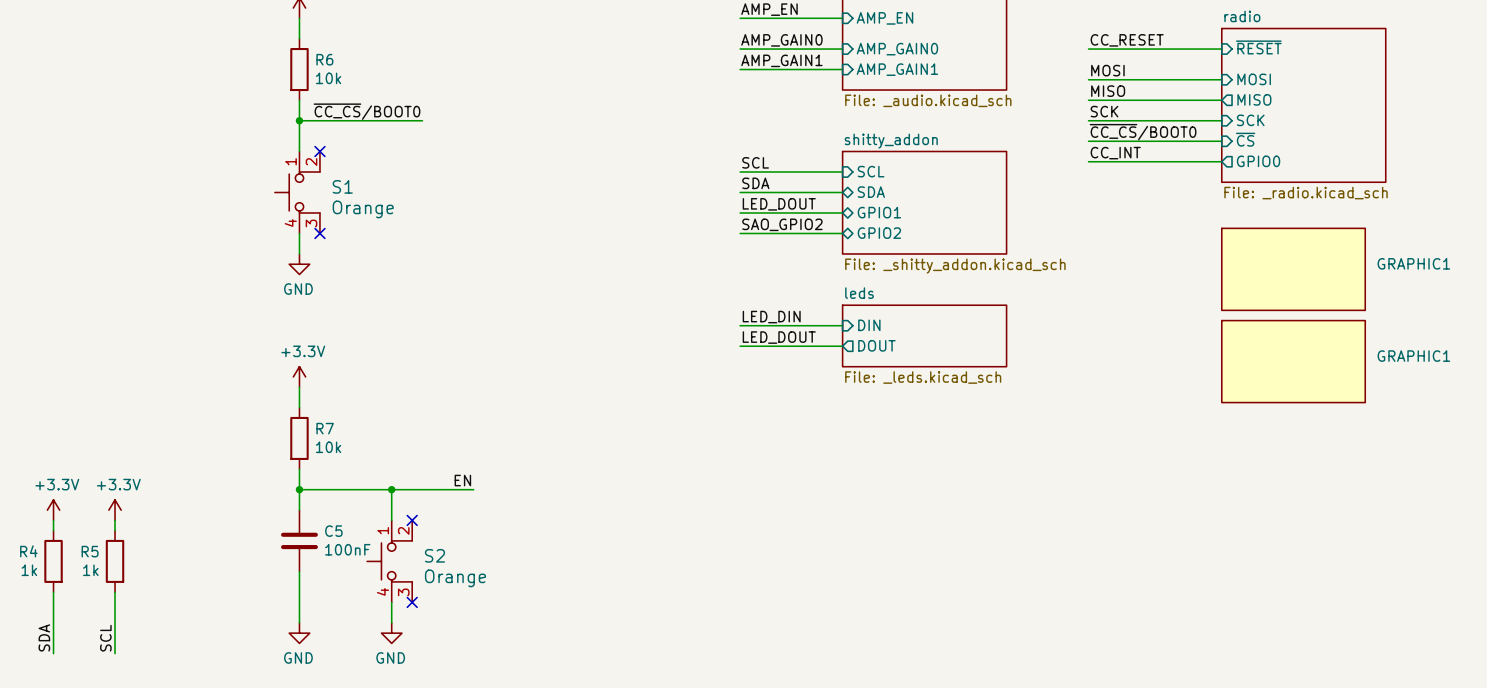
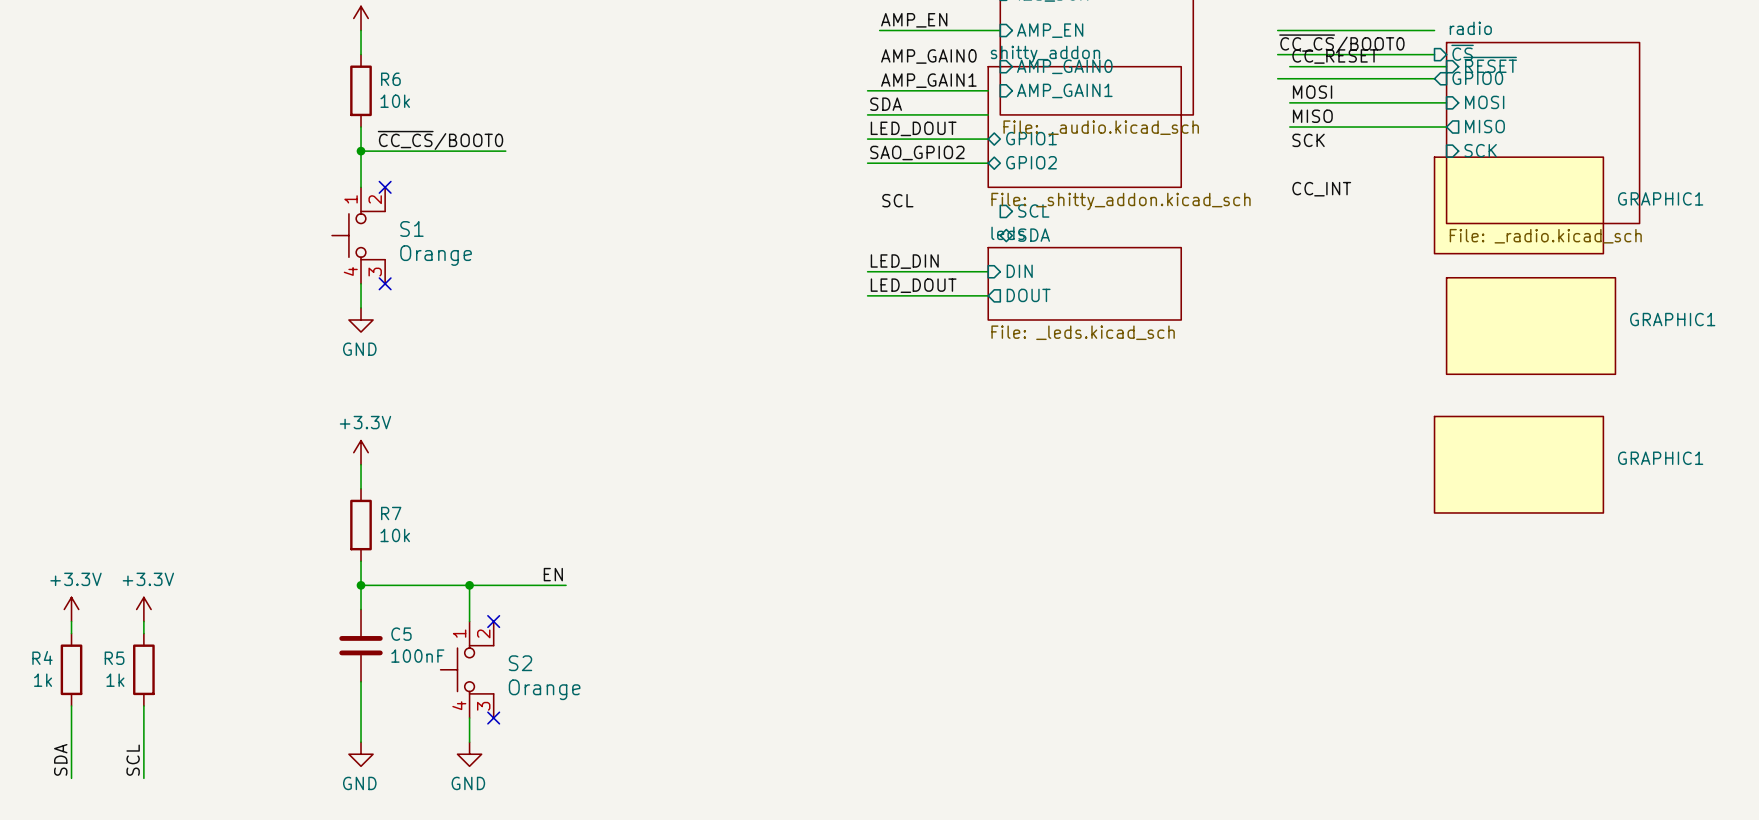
wire: (740, 49) (842, 49) -> none
wire: (832, 69) (842, 69) -> (867, 90) (879, 90)
label: none -> LED_DOUT (913, 128)
wire: (1088, 120) (1221, 120) -> (1277, 30) (1434, 30)
label position: ~{CC_CS}/BOOT0 (1143, 132) -> ~{CC_CS}/BOOT0 (1341, 43)
sheet pin position: ~{CS} (1245, 139) -> ~{CS} (1462, 52)
wire: (1088, 141) (1221, 141) -> (1277, 54) (1434, 54)
wire: (1088, 161) (1221, 161) -> (1277, 78) (1434, 78)
sheet pin position: GPIO0 (1258, 161) -> GPIO0 (1477, 78)
GRAPHIC1: none -> (1518, 205)
wire: (740, 172) (842, 172) -> none
label position: SDA (755, 183) -> SDA (886, 104)
wire: (740, 192) (842, 192) -> (867, 114) (988, 114)
sheet shitty_addon position: (924, 202) -> (1084, 127)
label position: LED_DOUT (779, 204) -> LED_DOUT (913, 285)
wire: (740, 212) (842, 212) -> (867, 139) (988, 139)
sheet pin position: GPIO1 (879, 212) -> GPIO1 (1031, 138)
label position: SAO_GPIO2 (782, 224) -> SAO_GPIO2 (917, 153)
wire: (740, 233) (842, 233) -> (867, 163) (988, 163)
sheet pin position: GPIO2 (879, 233) -> GPIO2 (1031, 162)
label position: LED_DIN (771, 317) -> LED_DIN (904, 261)
wire: (740, 325) (842, 325) -> (867, 271) (988, 271)
sheet pin position: DIN (869, 325) -> DIN (1019, 271)
sheet leds position: (924, 335) -> (1084, 283)
label: LED_DOUT (779, 337) -> none
sheet pin position: DOUT (876, 345) -> DOUT (1028, 295)
wire: (740, 346) (842, 346) -> (867, 295) (988, 295)
GRAPHIC1 position: (1293, 361) -> (1518, 464)

